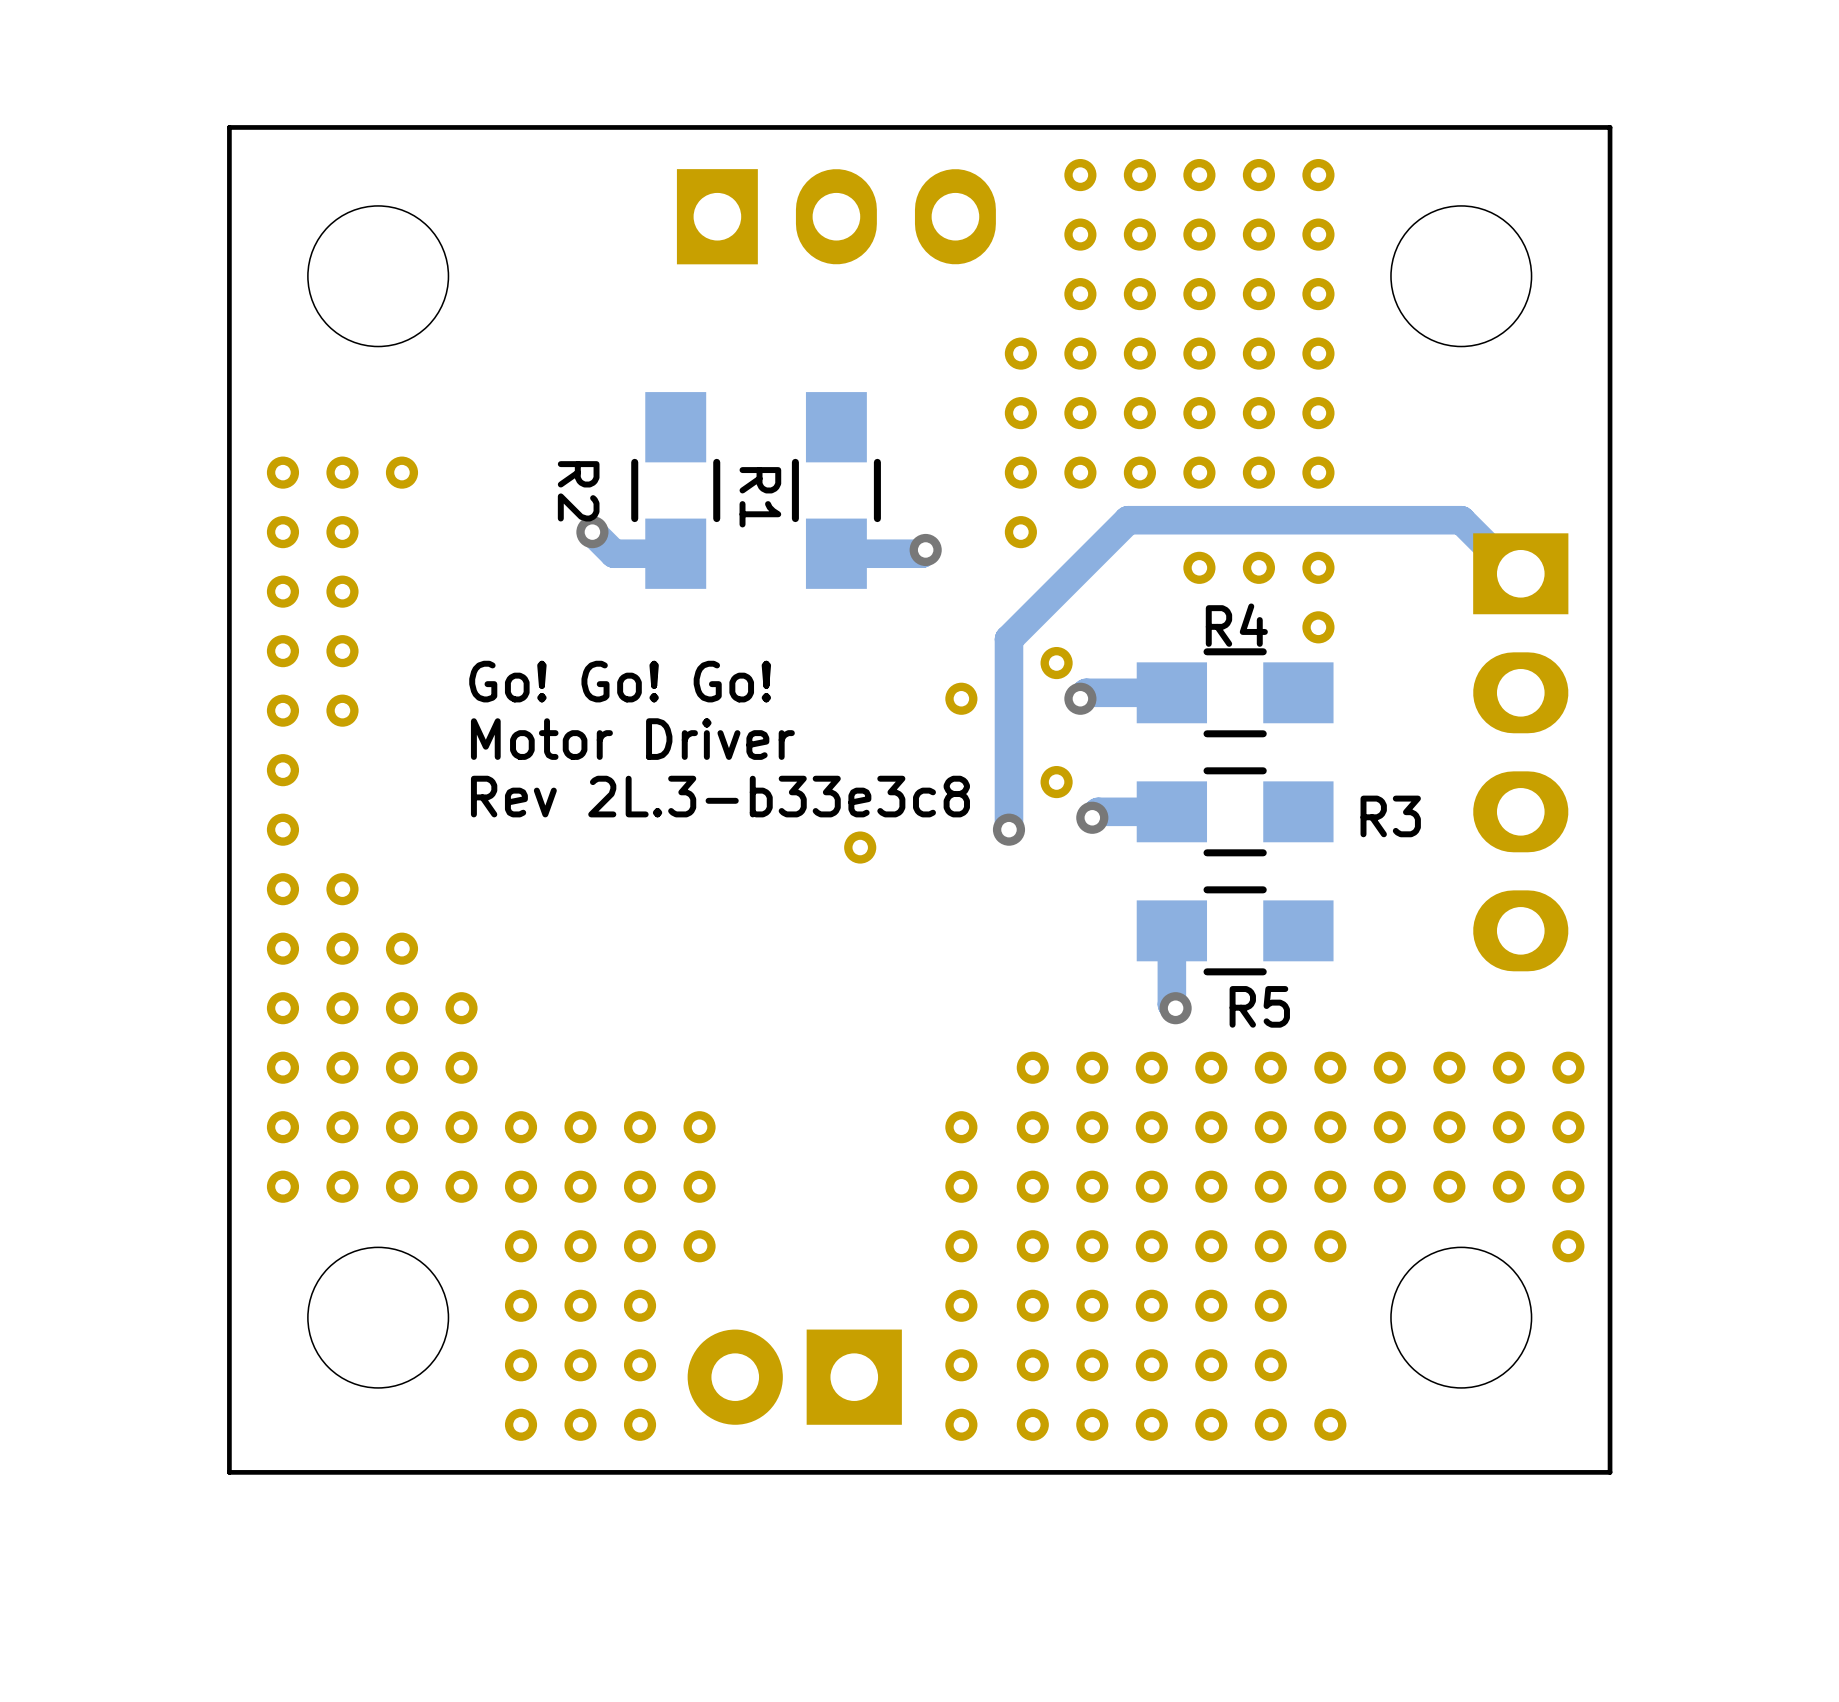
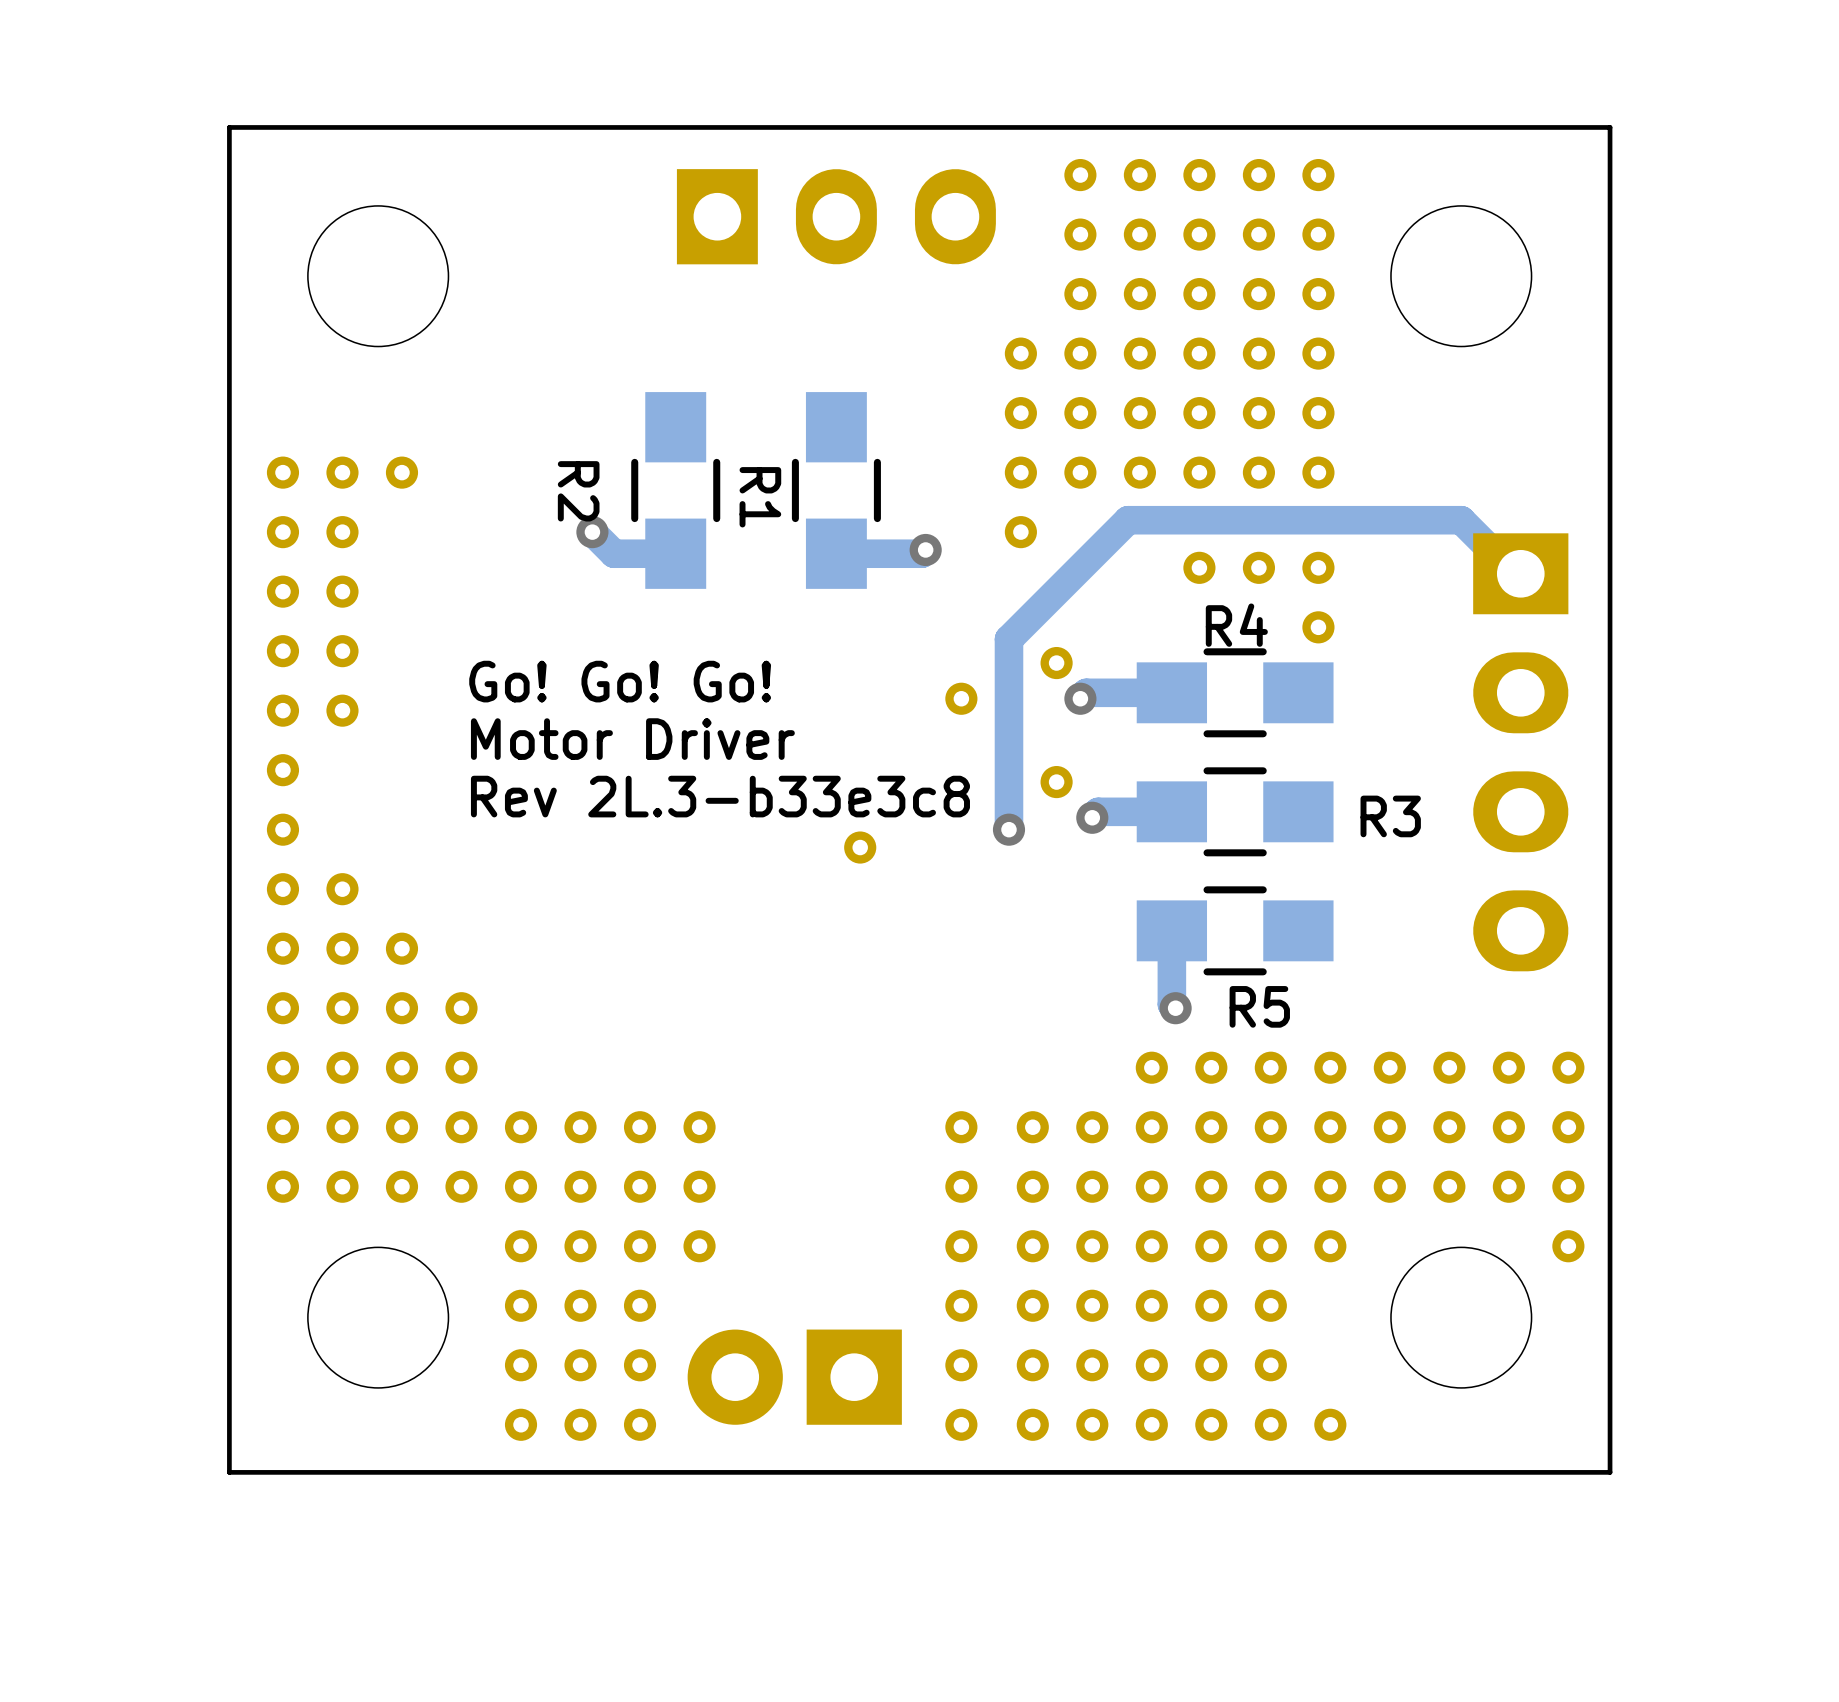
part: (1032, 1067) -> none
part: (1092, 1067) -> none

